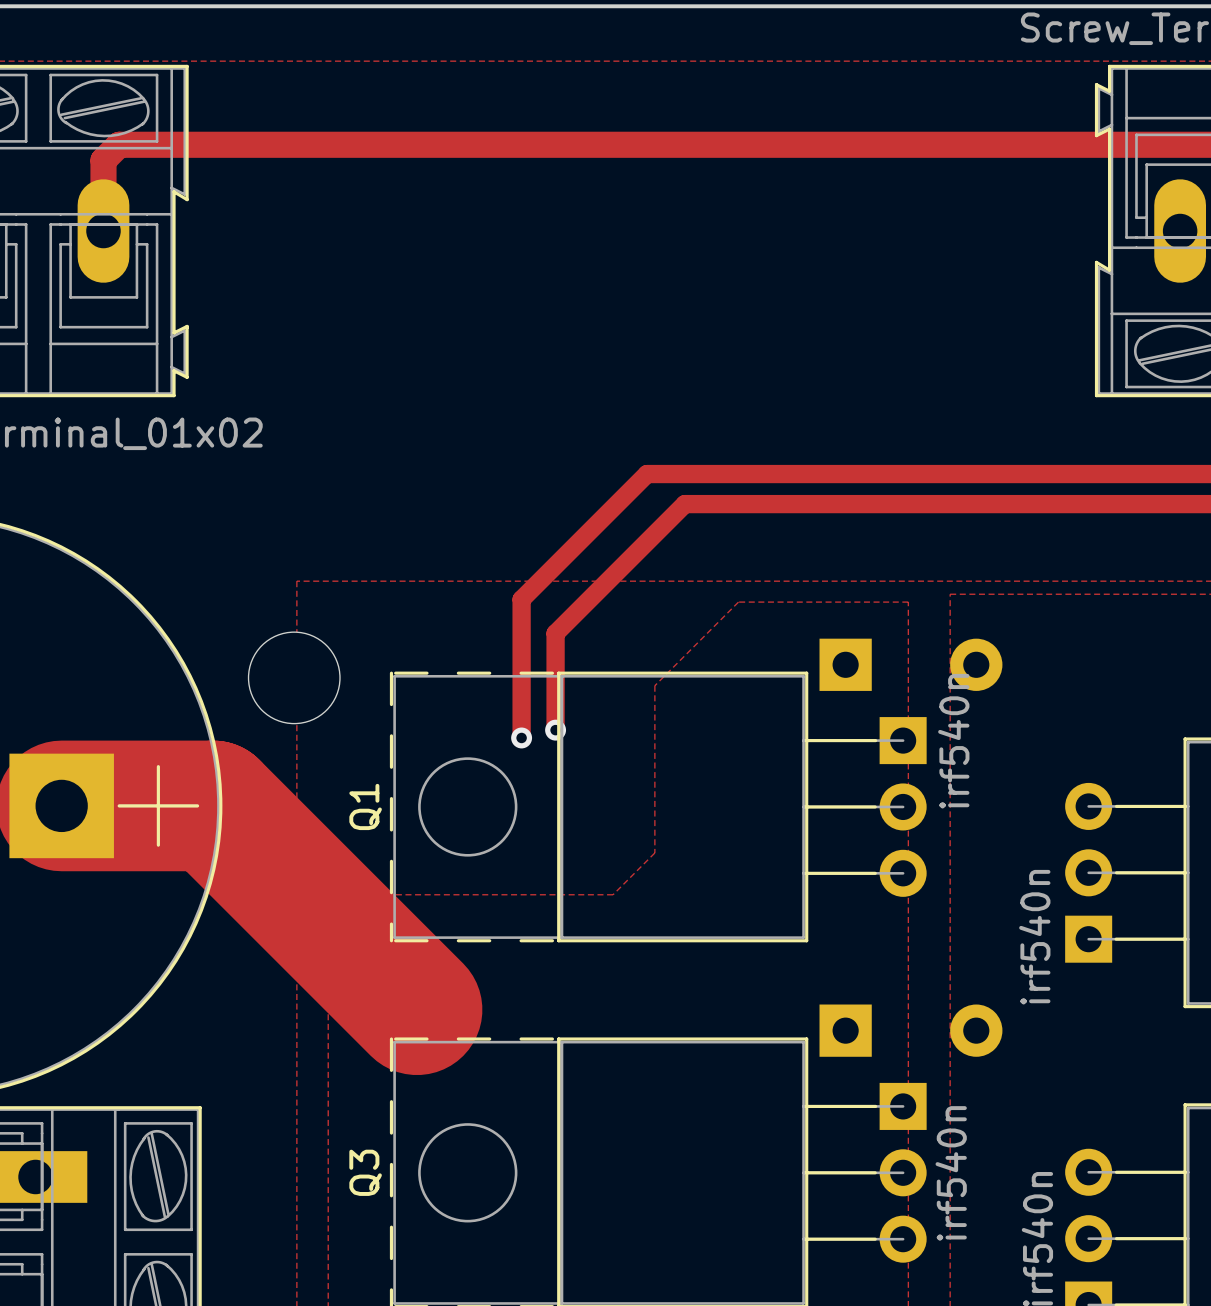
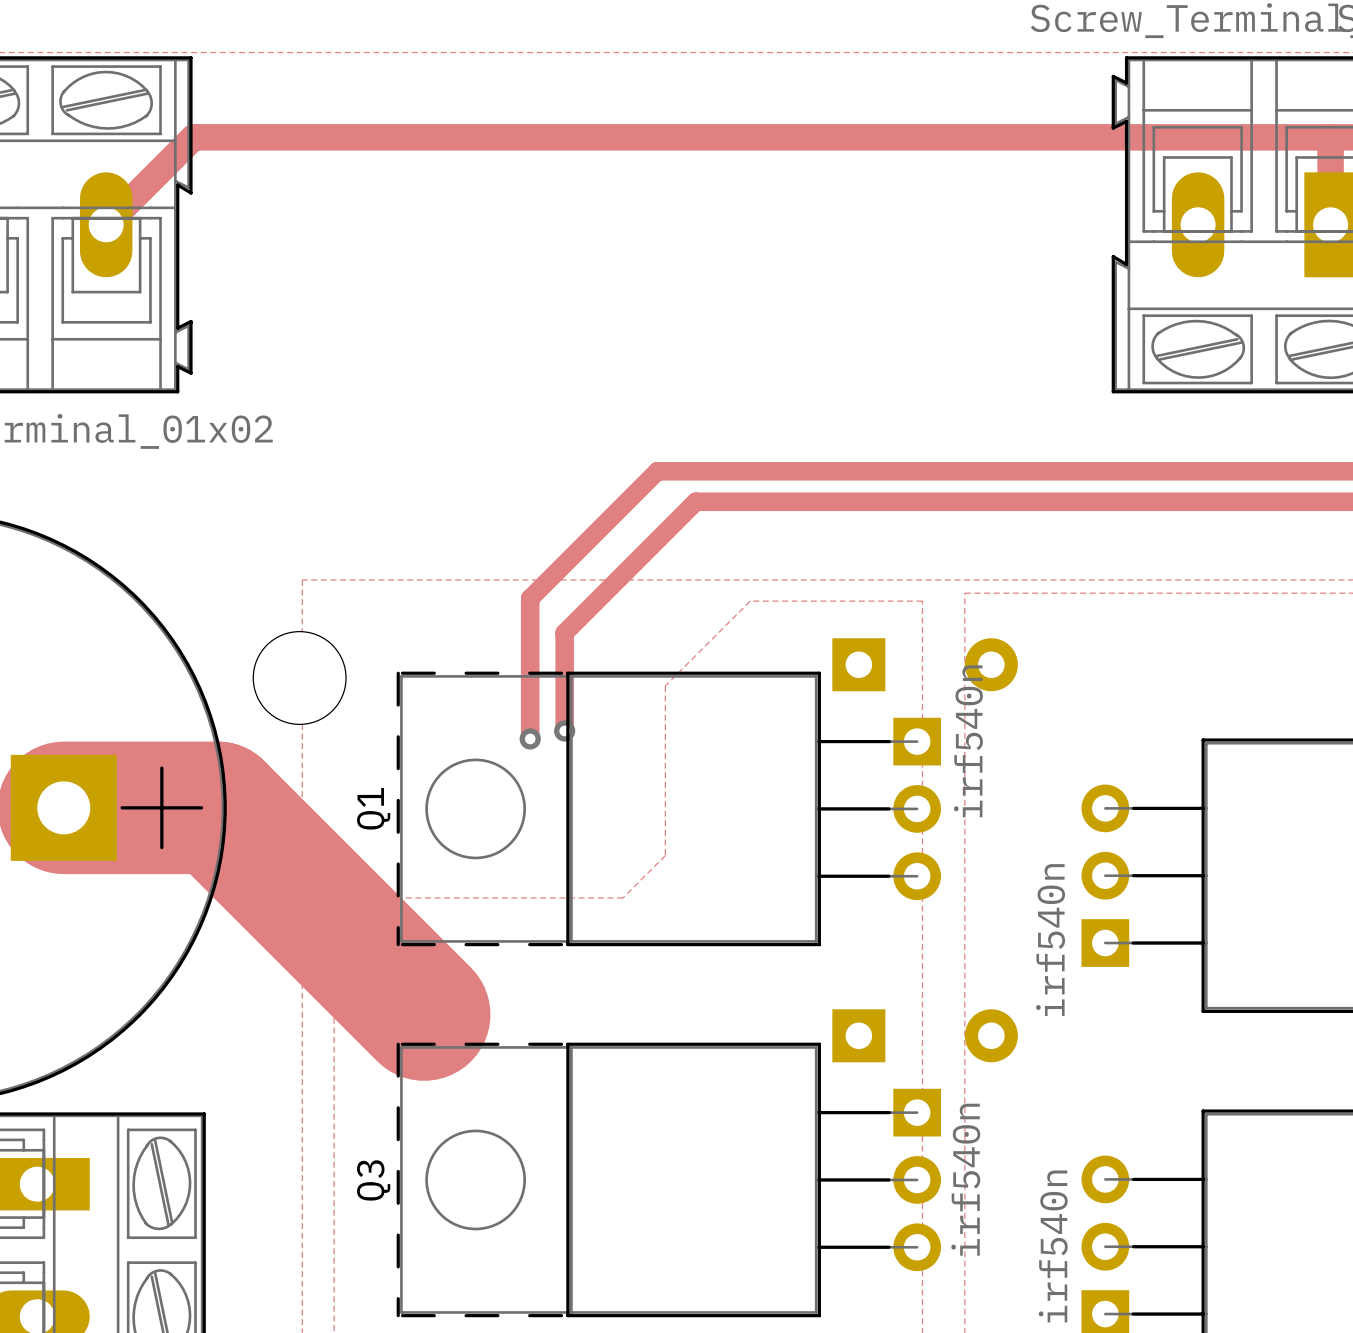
track: (189, 144) (119, 144) (103, 160) (103, 231) -> (193, 137) (108, 222)

